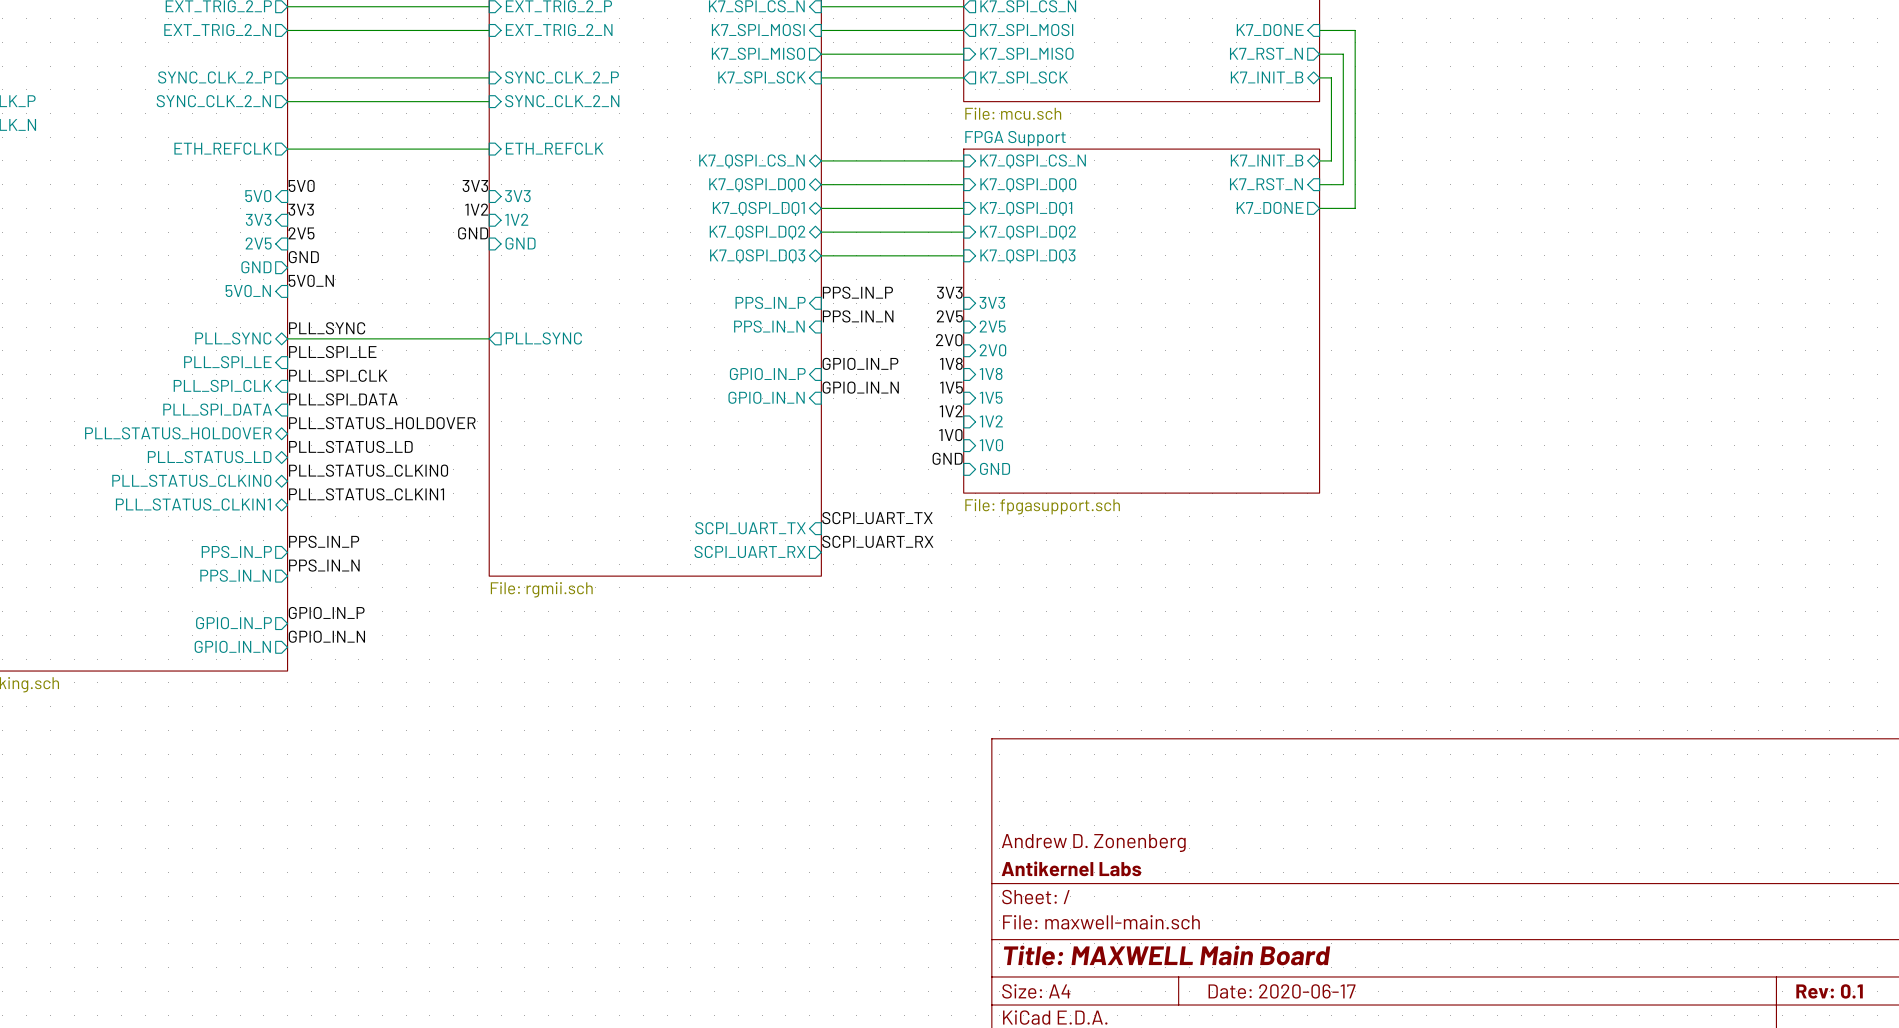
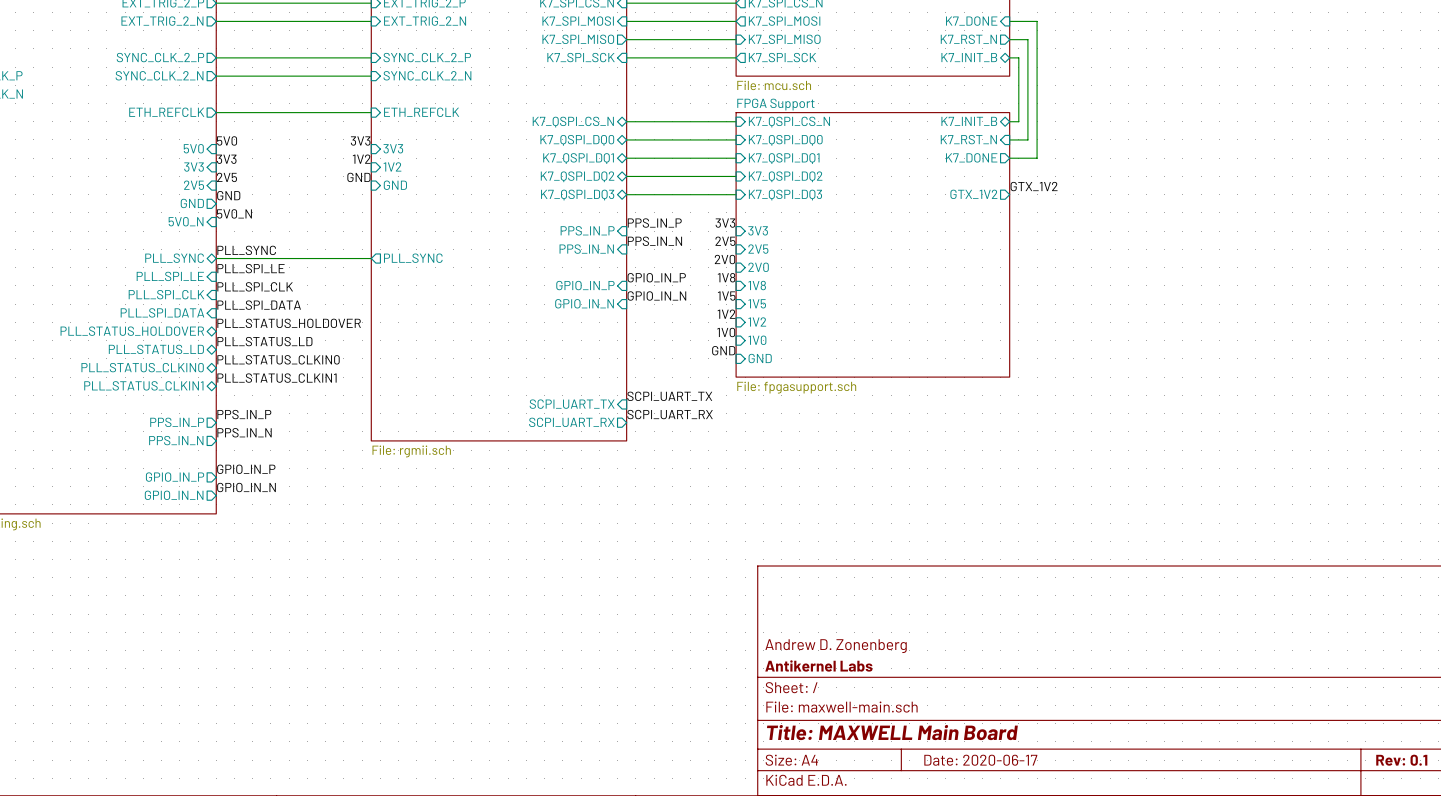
label: none -> GTX_1V2 (1034, 186)
sheet pin: none -> GTX_1V2 (973, 194)

